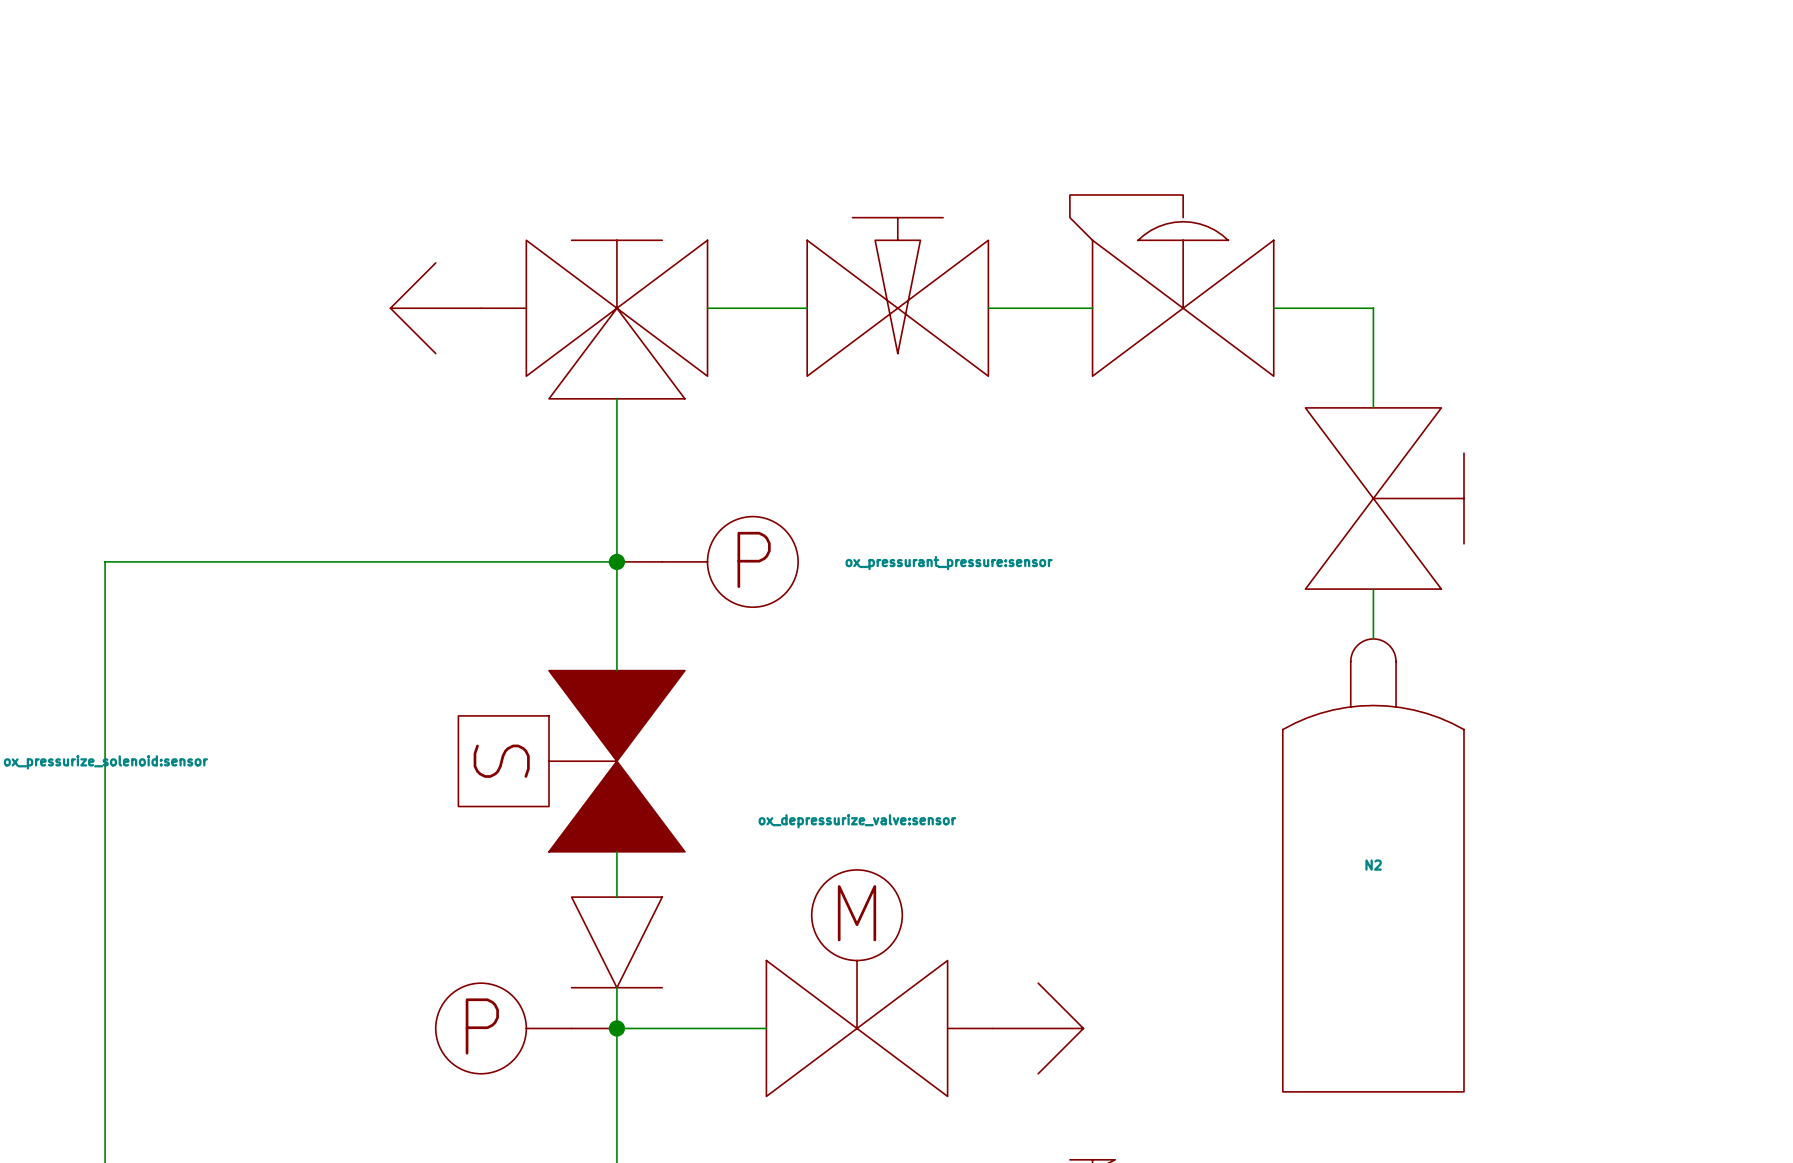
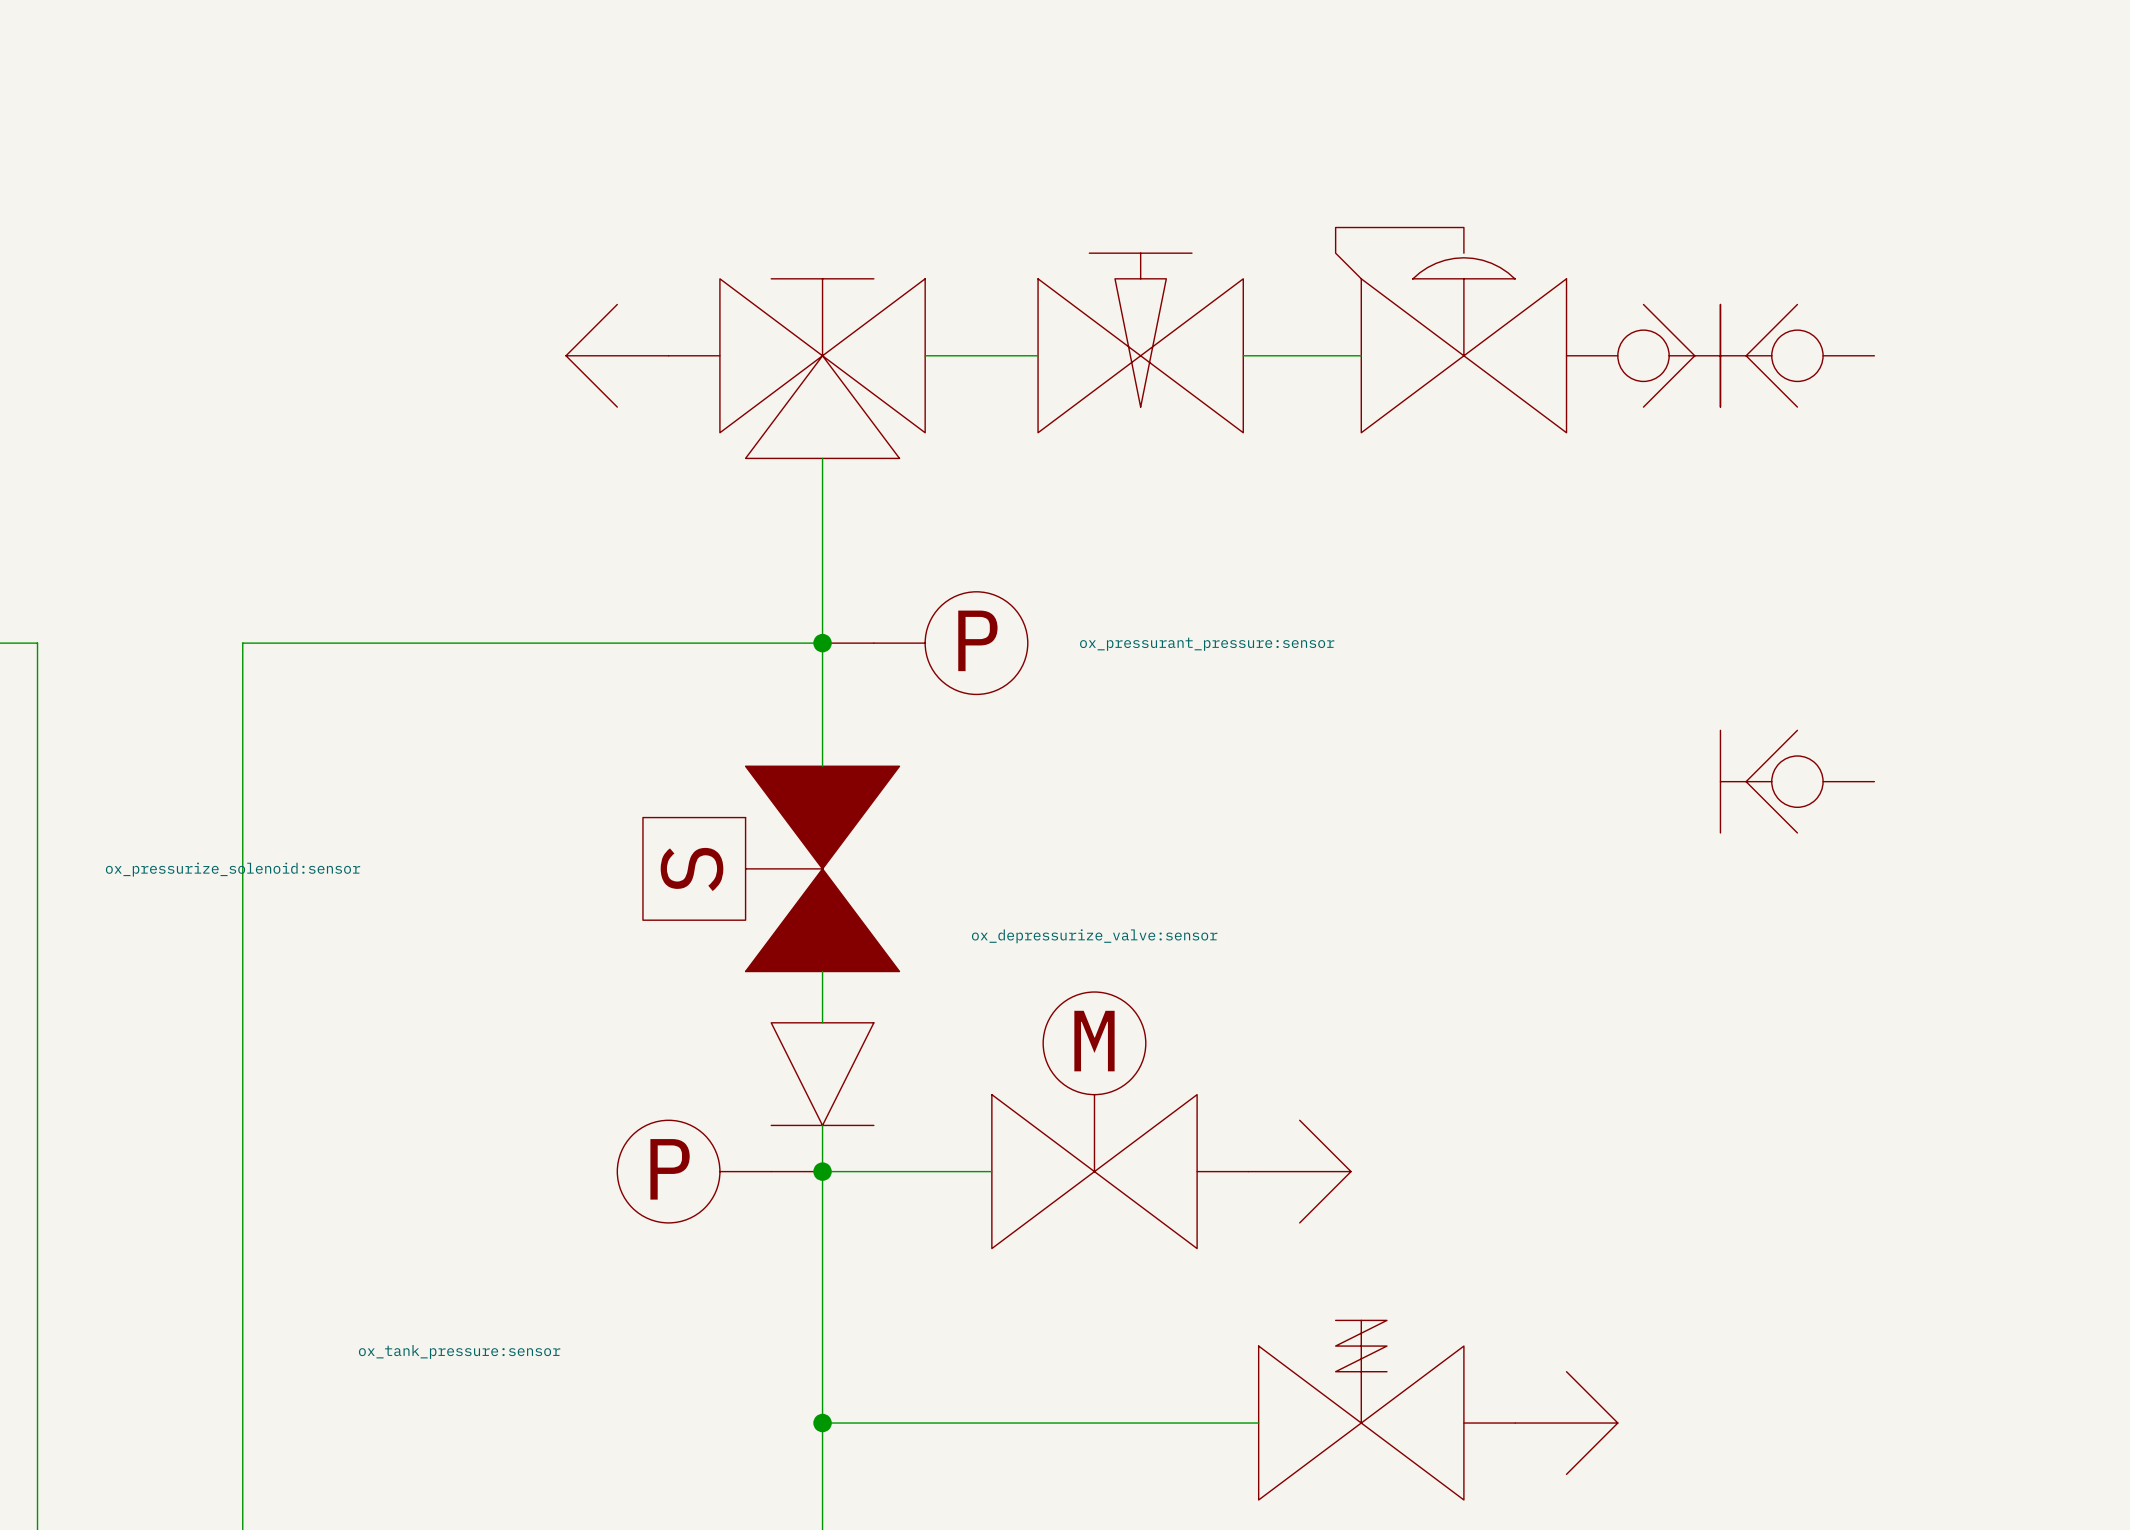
wire: (1273, 308) (1373, 308) (1373, 407) -> none
part: none -> (1643, 355)
part: none -> (1797, 355)
part: (1384, 498) -> none
wire: (1373, 589) (1373, 638) -> none
part: none -> (1797, 781)
N2: (1373, 865) -> none

